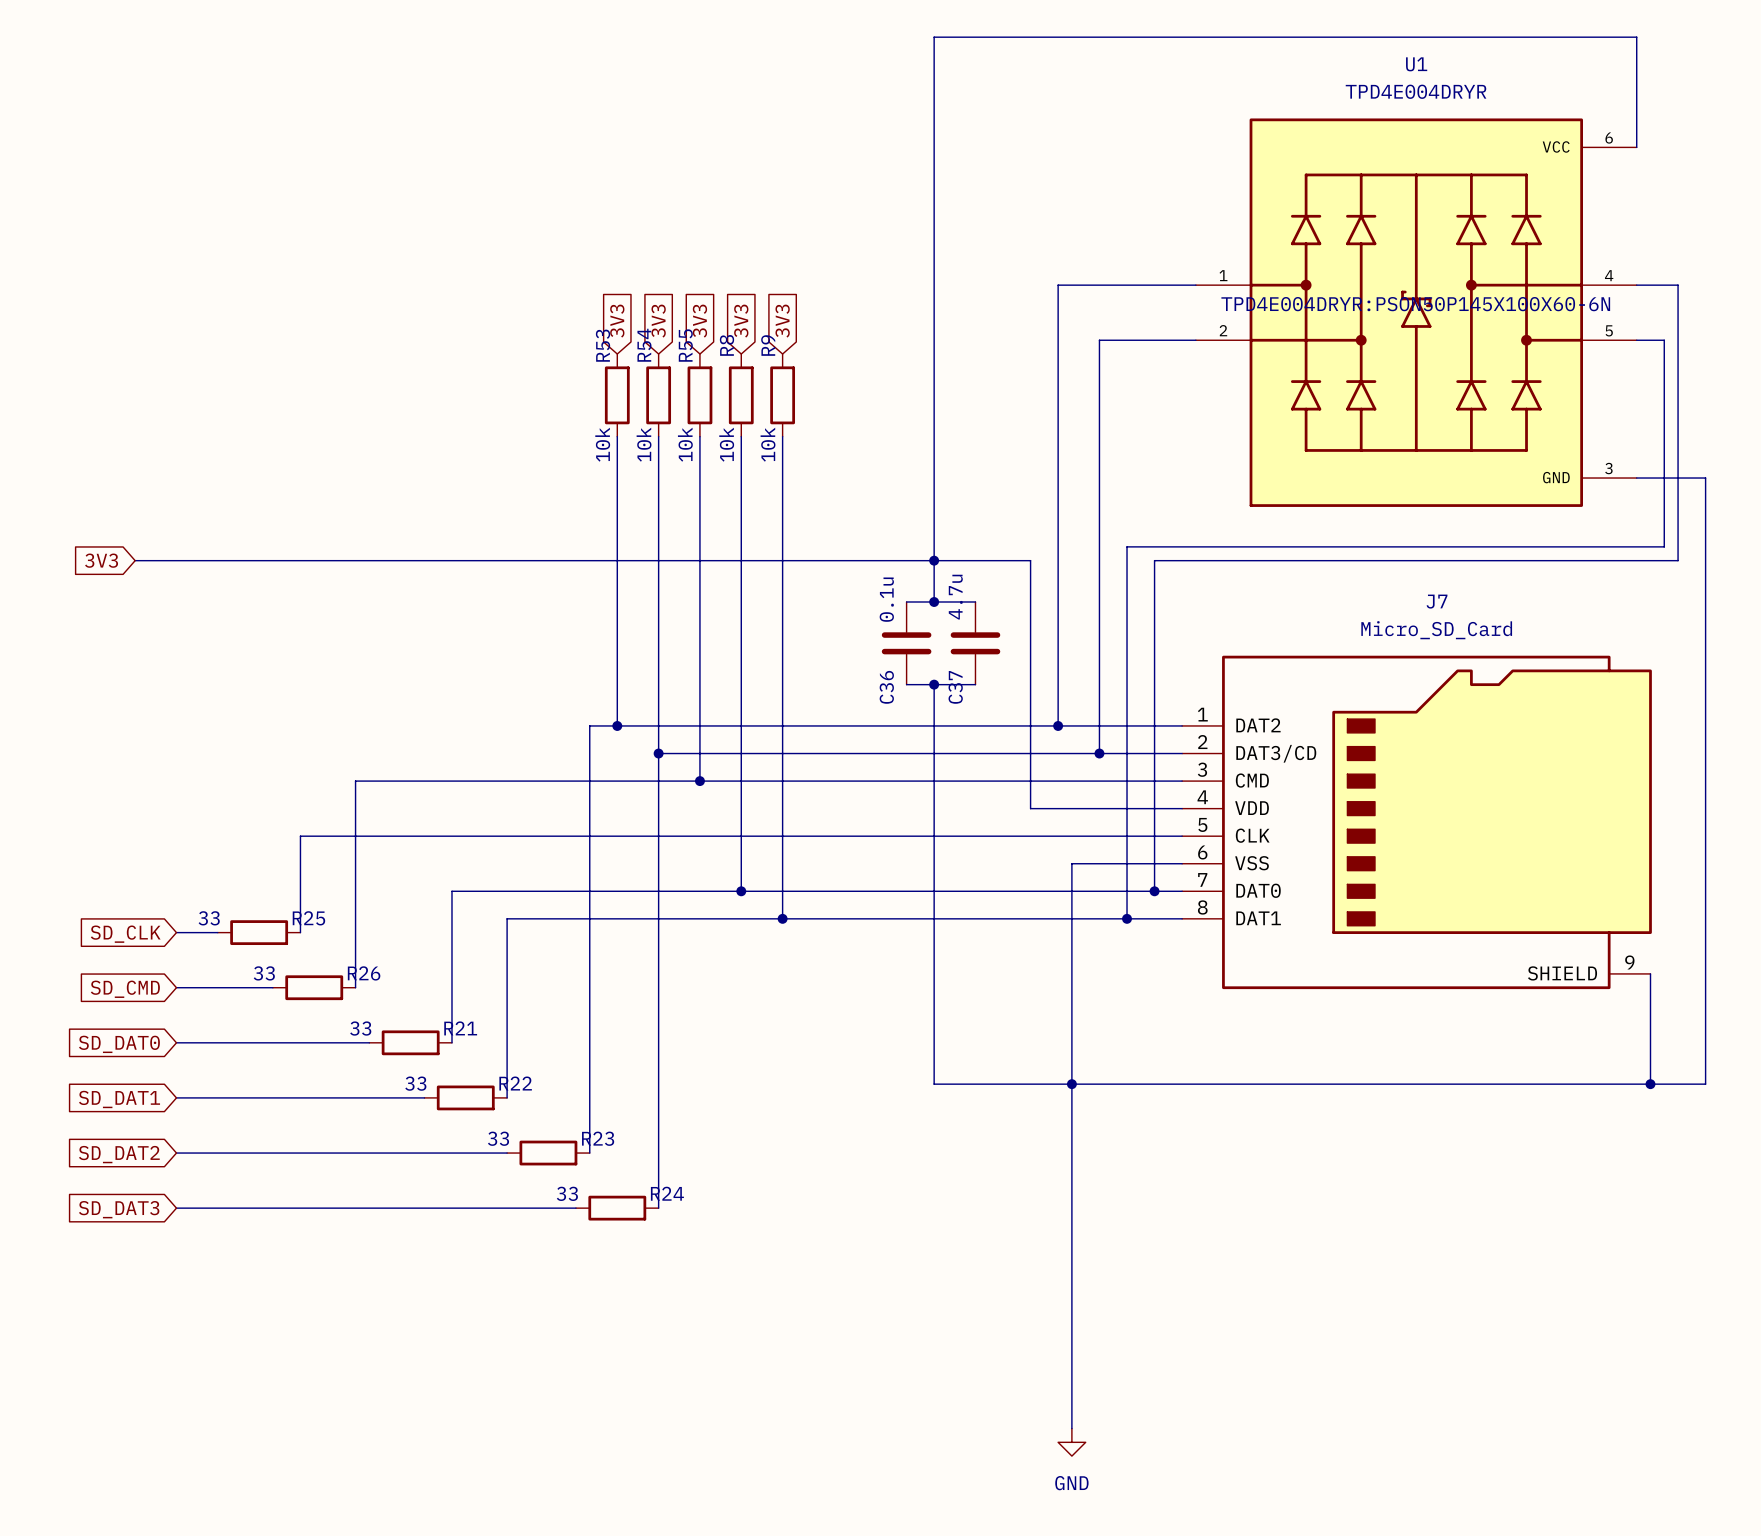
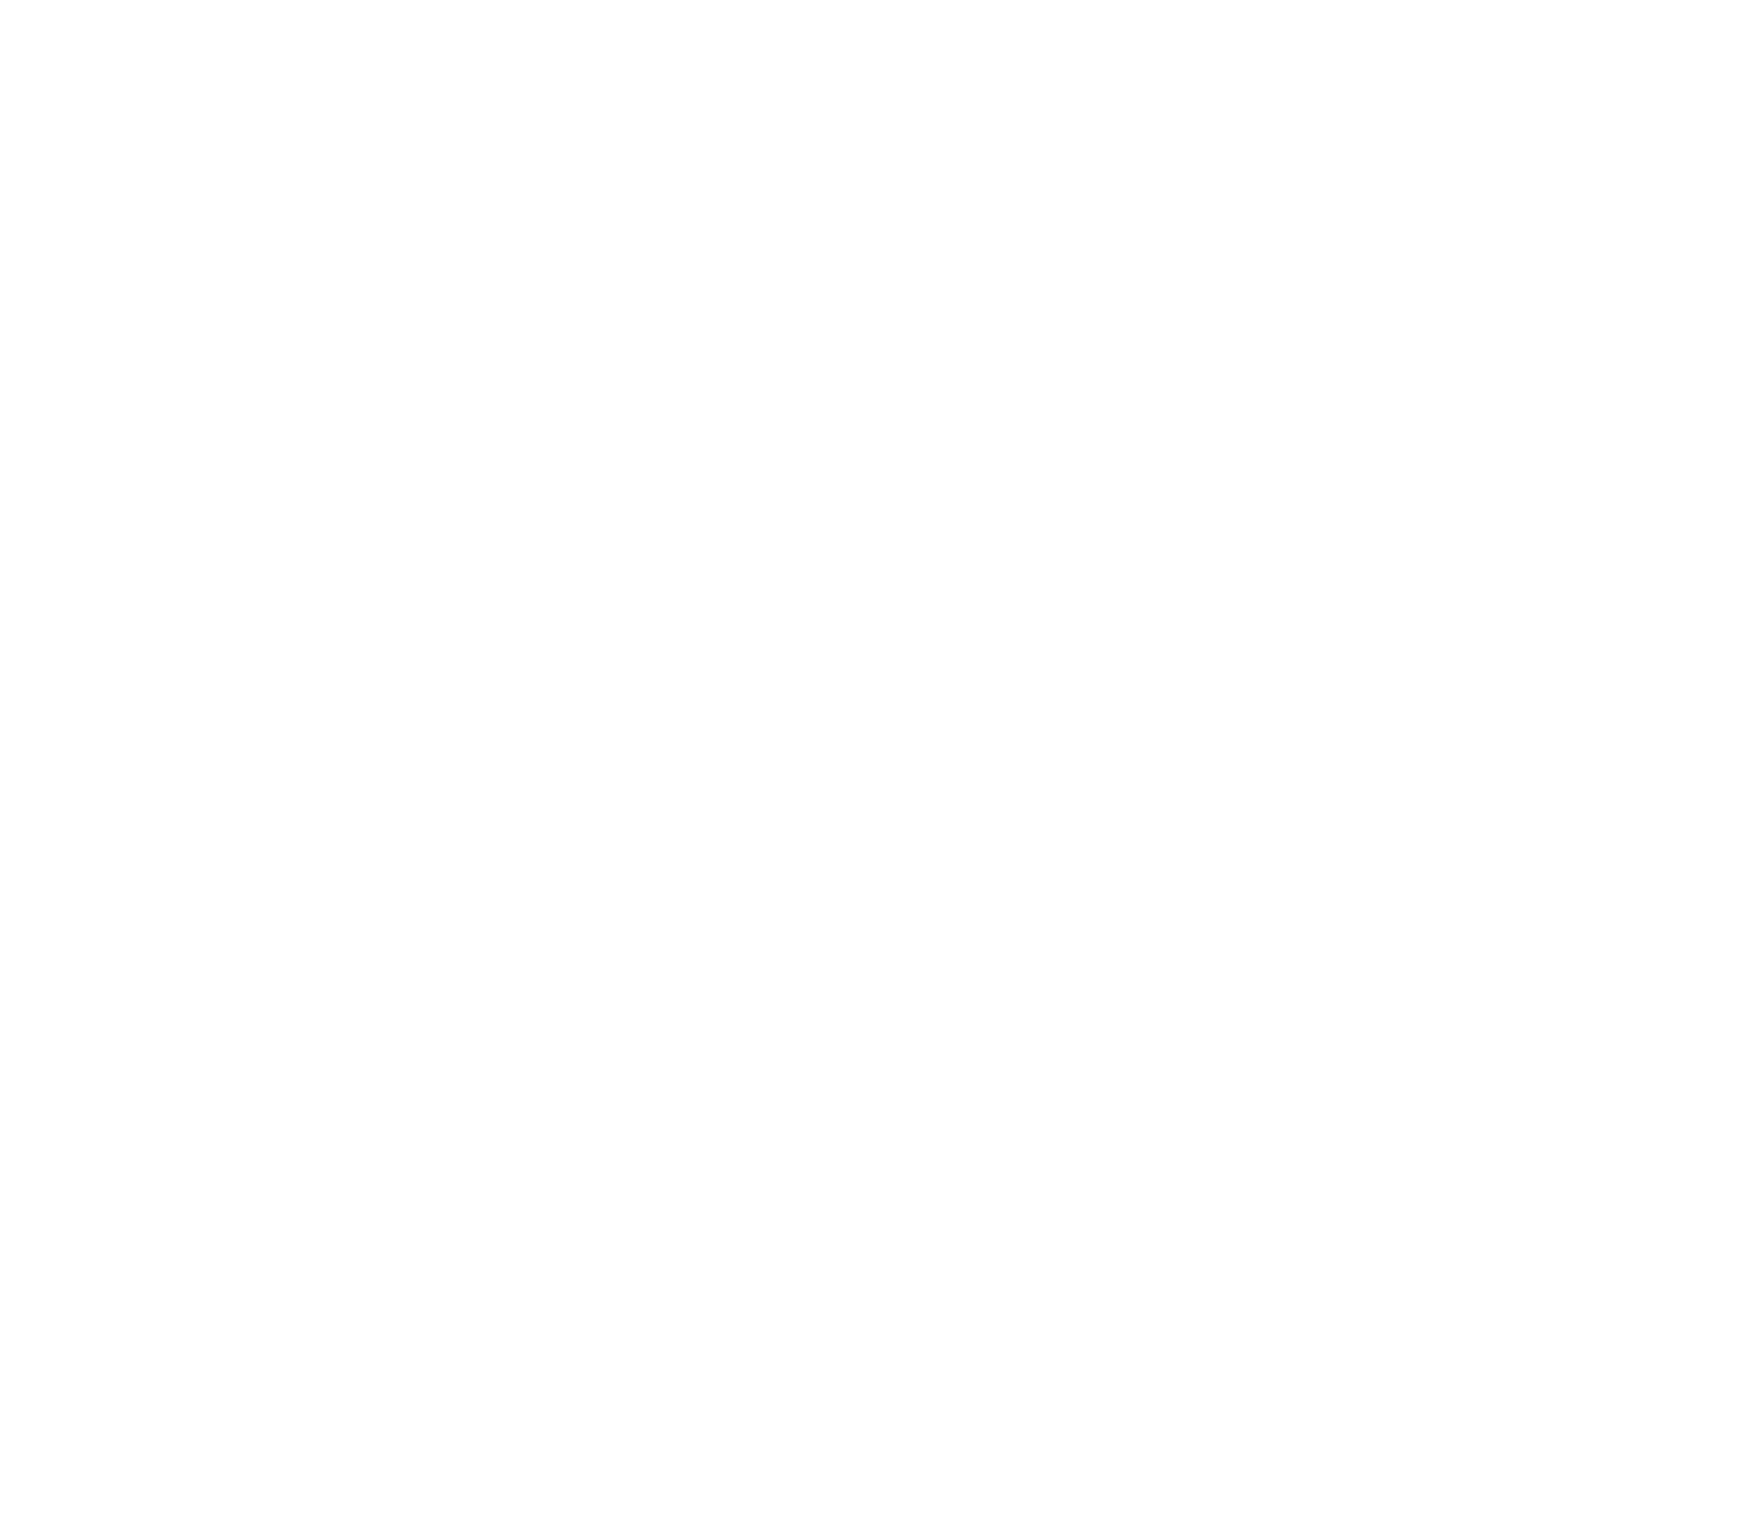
wire: (1636, 147) (1636, 37) (934, 37) (934, 601) -> none
wire: (1195, 285) (1058, 285) (1058, 725) -> none
wire: (1636, 285) (1678, 285) (1678, 560) (1154, 560) (1154, 891) -> none
U1: TPD4E004DRYR (1416, 312) -> none
global label: 3V3 (617, 321) -> none
global label: 3V3 (658, 321) -> none
global label: 3V3 (699, 321) -> none
global label: 3V3 (741, 321) -> none
global label: 3V3 (782, 321) -> none
wire: (1195, 340) (1099, 340) (1099, 753) -> none
wire: (1636, 340) (1664, 340) (1664, 546) (1127, 546) (1127, 918) -> none
R53: 10k (617, 395) -> none
R54: 10k (658, 395) -> none
R55: 10k (699, 395) -> none
R8: 10k (741, 395) -> none
R9: 10k (782, 395) -> none
wire: (617, 436) (617, 725) -> none
wire: (658, 436) (658, 1208) -> none
wire: (699, 436) (699, 781) -> none
wire: (741, 436) (741, 891) -> none
wire: (782, 436) (782, 918) -> none
wire: (1636, 478) (1705, 478) (1705, 1084) (934, 1084) (934, 684) -> none
global label: 3V3 (101, 560) -> none
wire: (135, 560) (1030, 560) (1030, 808) (1182, 808) -> none
junction: (934, 560) -> none
wire: (906, 601) (975, 601) -> none
junction: (934, 601) -> none
C36: 0.1u (906, 643) -> none
C37: 4.7u (975, 643) -> none
wire: (906, 684) (975, 684) -> none
junction: (934, 684) -> none
junction: (617, 725) -> none
junction: (1058, 725) -> none
wire: (1182, 725) (589, 725) (589, 1153) -> none
wire: (658, 753) (1182, 753) -> none
junction: (658, 753) -> none
junction: (1099, 753) -> none
junction: (699, 781) -> none
wire: (1182, 781) (355, 781) (355, 987) -> none
J7: Micro_SD_Card (1416, 822) -> none
wire: (1182, 836) (300, 836) (300, 932) -> none
wire: (1182, 863) (1071, 863) (1071, 1428) -> none
junction: (741, 891) -> none
junction: (1154, 891) -> none
wire: (1182, 891) (451, 891) (451, 1042) -> none
junction: (782, 918) -> none
junction: (1127, 918) -> none
wire: (1182, 918) (507, 918) (507, 1097) -> none
wire: (176, 932) (217, 932) -> none
R25: 33 (259, 932) -> none
global label: SD_CLK (125, 934) -> none
wire: (1650, 973) (1650, 1084) -> none
wire: (176, 987) (272, 987) -> none
R26: 33 (314, 987) -> none
global label: SD_CMD (125, 989) -> none
wire: (176, 1042) (369, 1042) -> none
R21: 33 (410, 1042) -> none
global label: SD_DAT0 (119, 1044) -> none
junction: (1071, 1084) -> none
junction: (1650, 1084) -> none
wire: (176, 1097) (424, 1097) -> none
R22: 33 (465, 1097) -> none
global label: SD_DAT1 (119, 1099) -> none
wire: (176, 1153) (507, 1153) -> none
R23: 33 (548, 1153) -> none
global label: SD_DAT2 (119, 1154) -> none
wire: (176, 1208) (575, 1208) -> none
R24: 33 (617, 1208) -> none
global label: SD_DAT3 (119, 1209) -> none
power symbol: GND (1071, 1442) -> none

